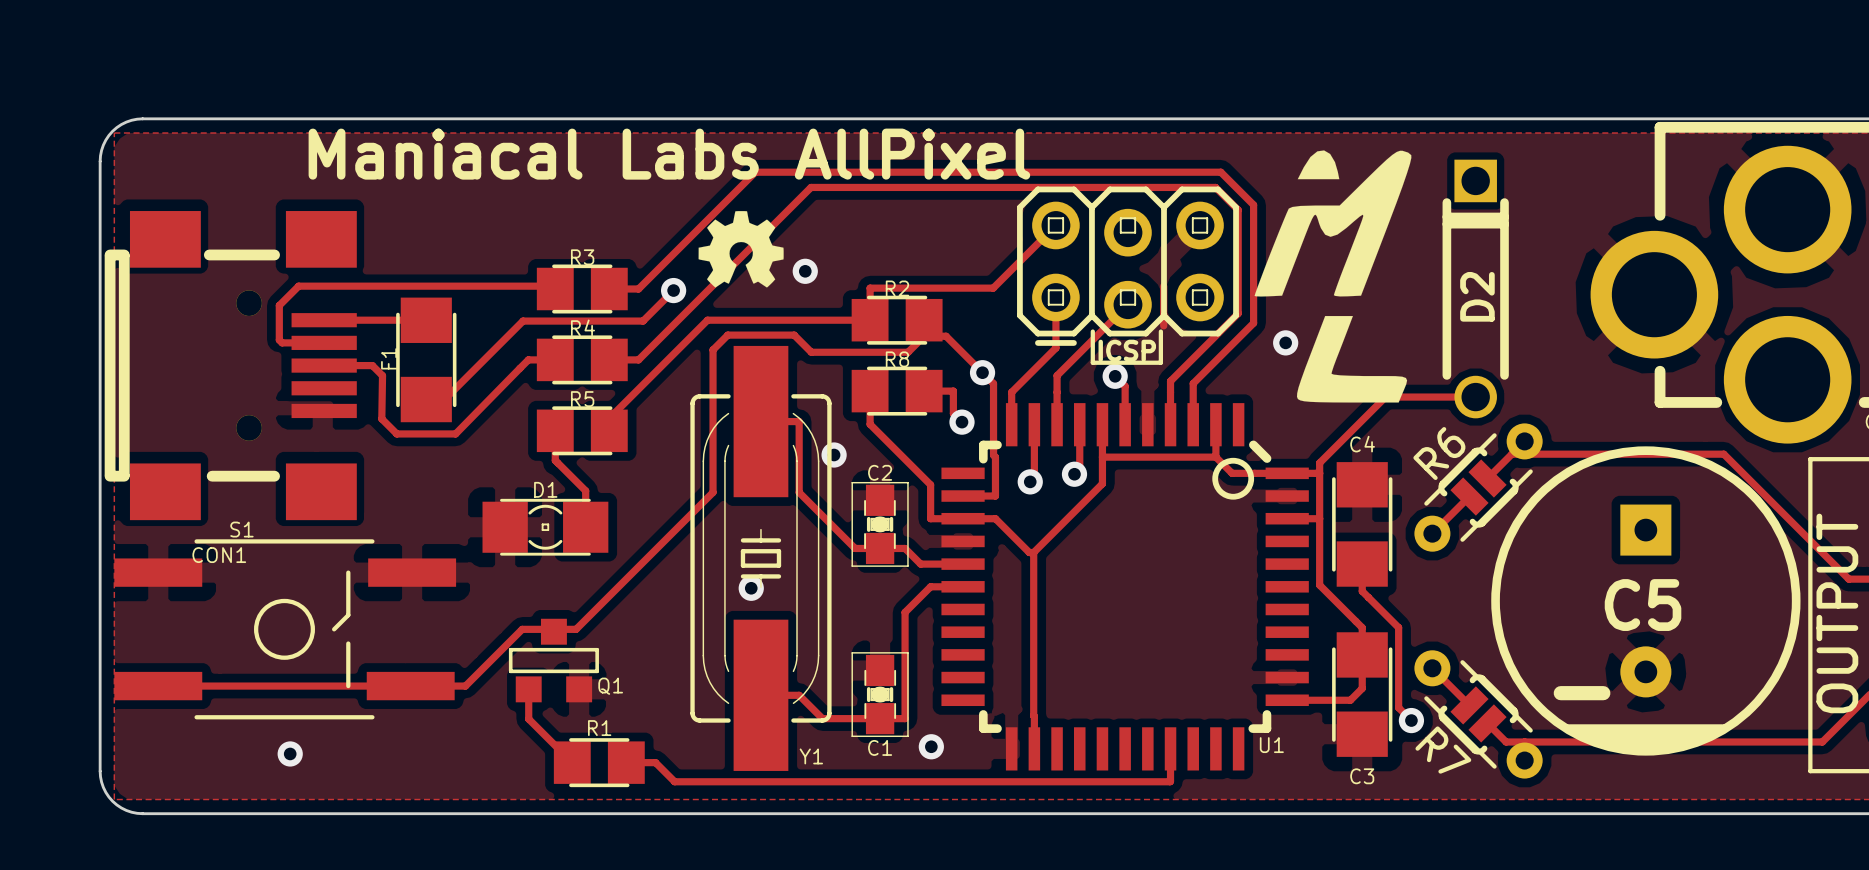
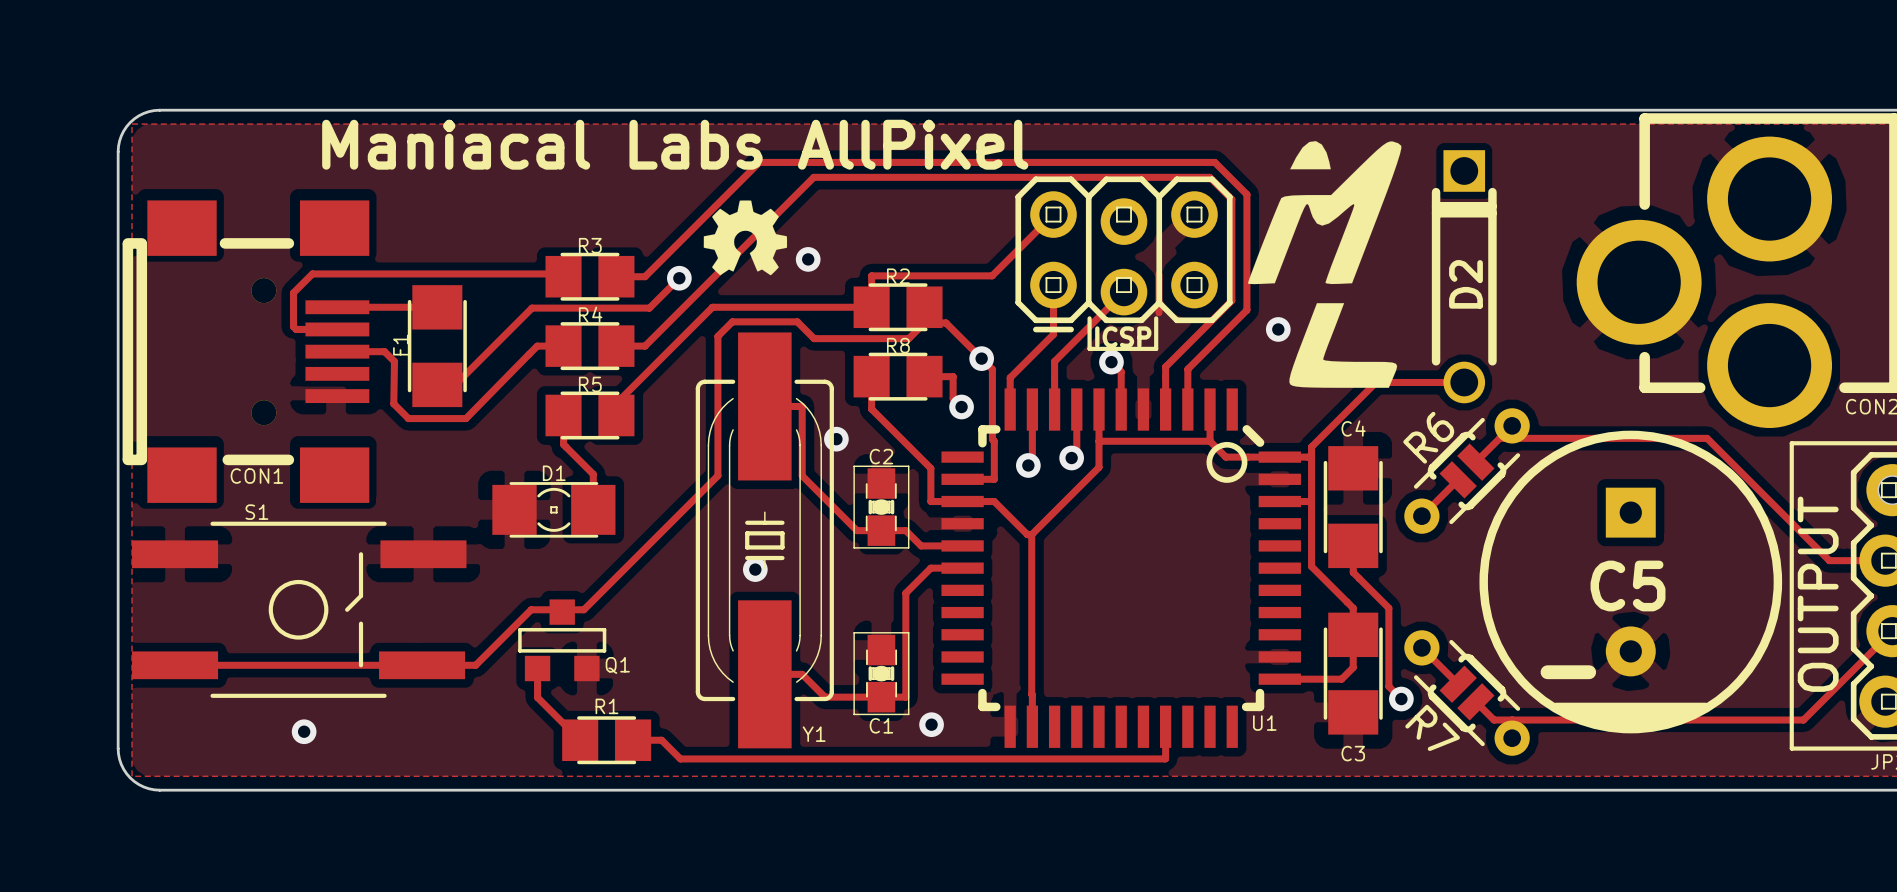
CON1 name position: CON1 (219, 555) -> CON1 (256, 476)

